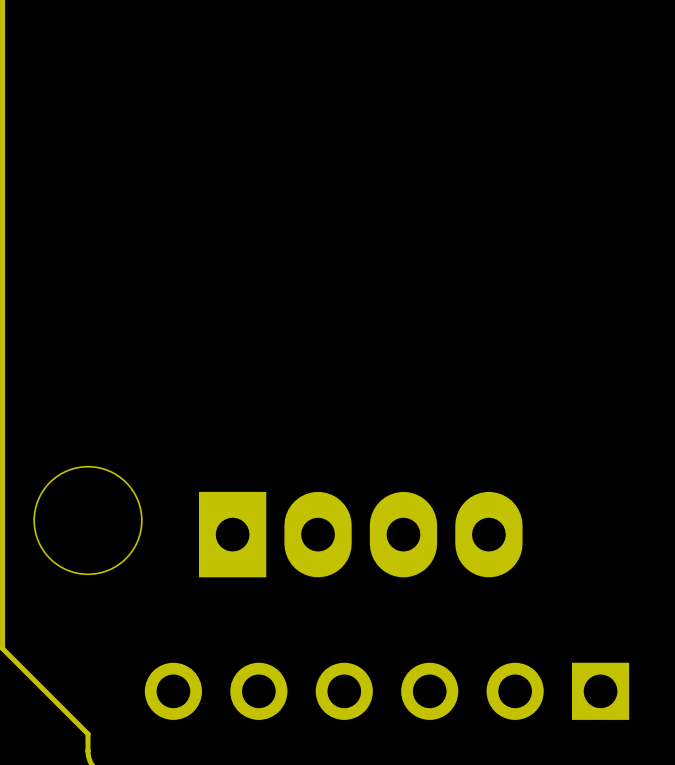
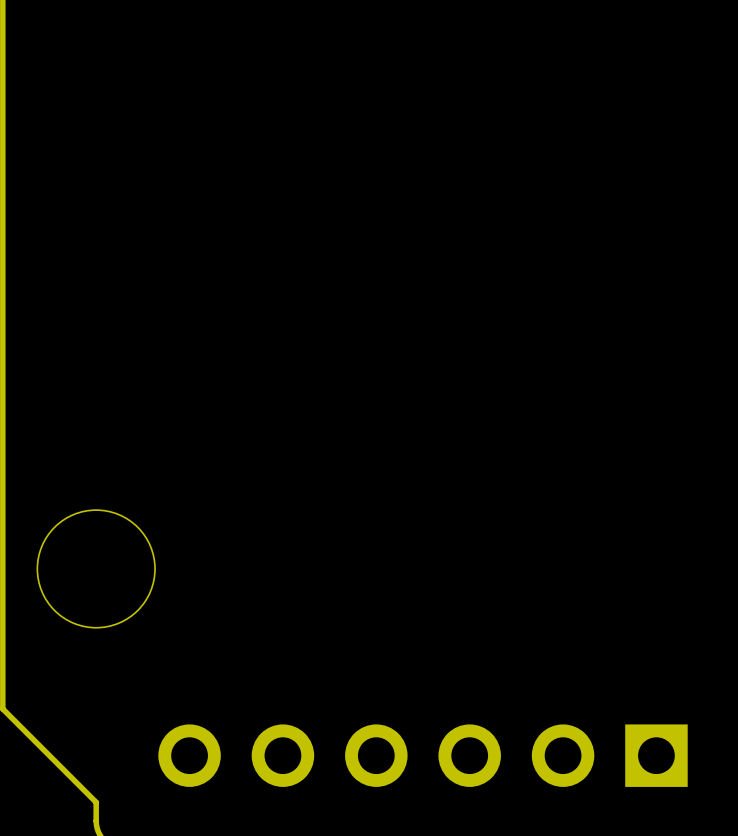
part: (360, 534) -> none

